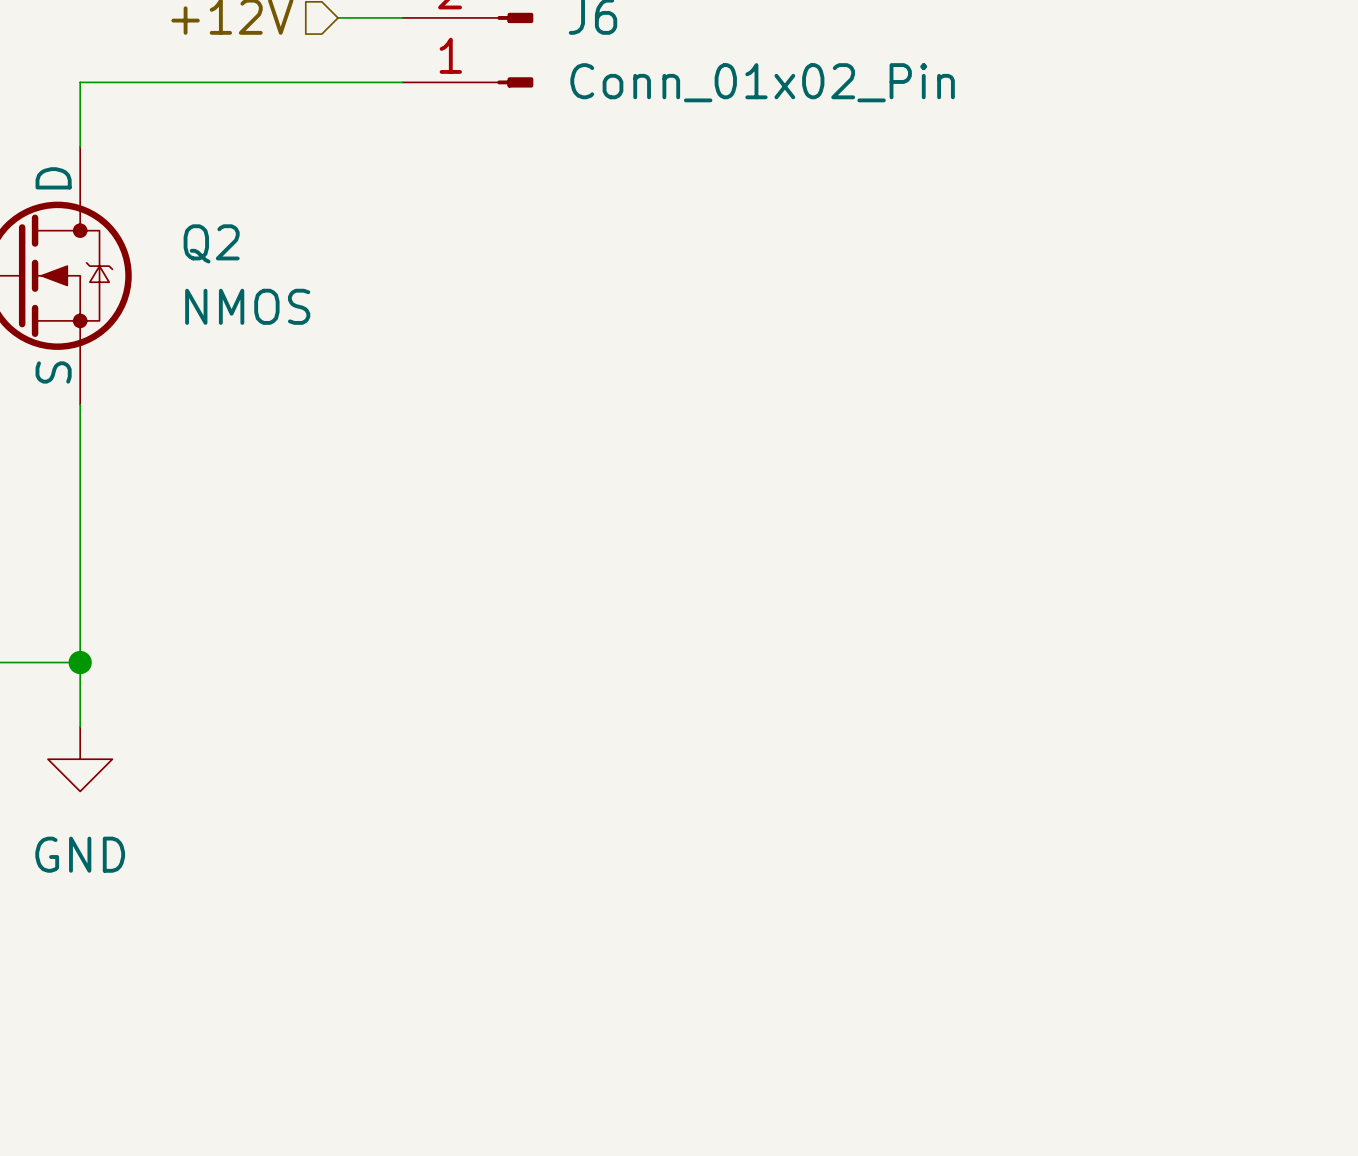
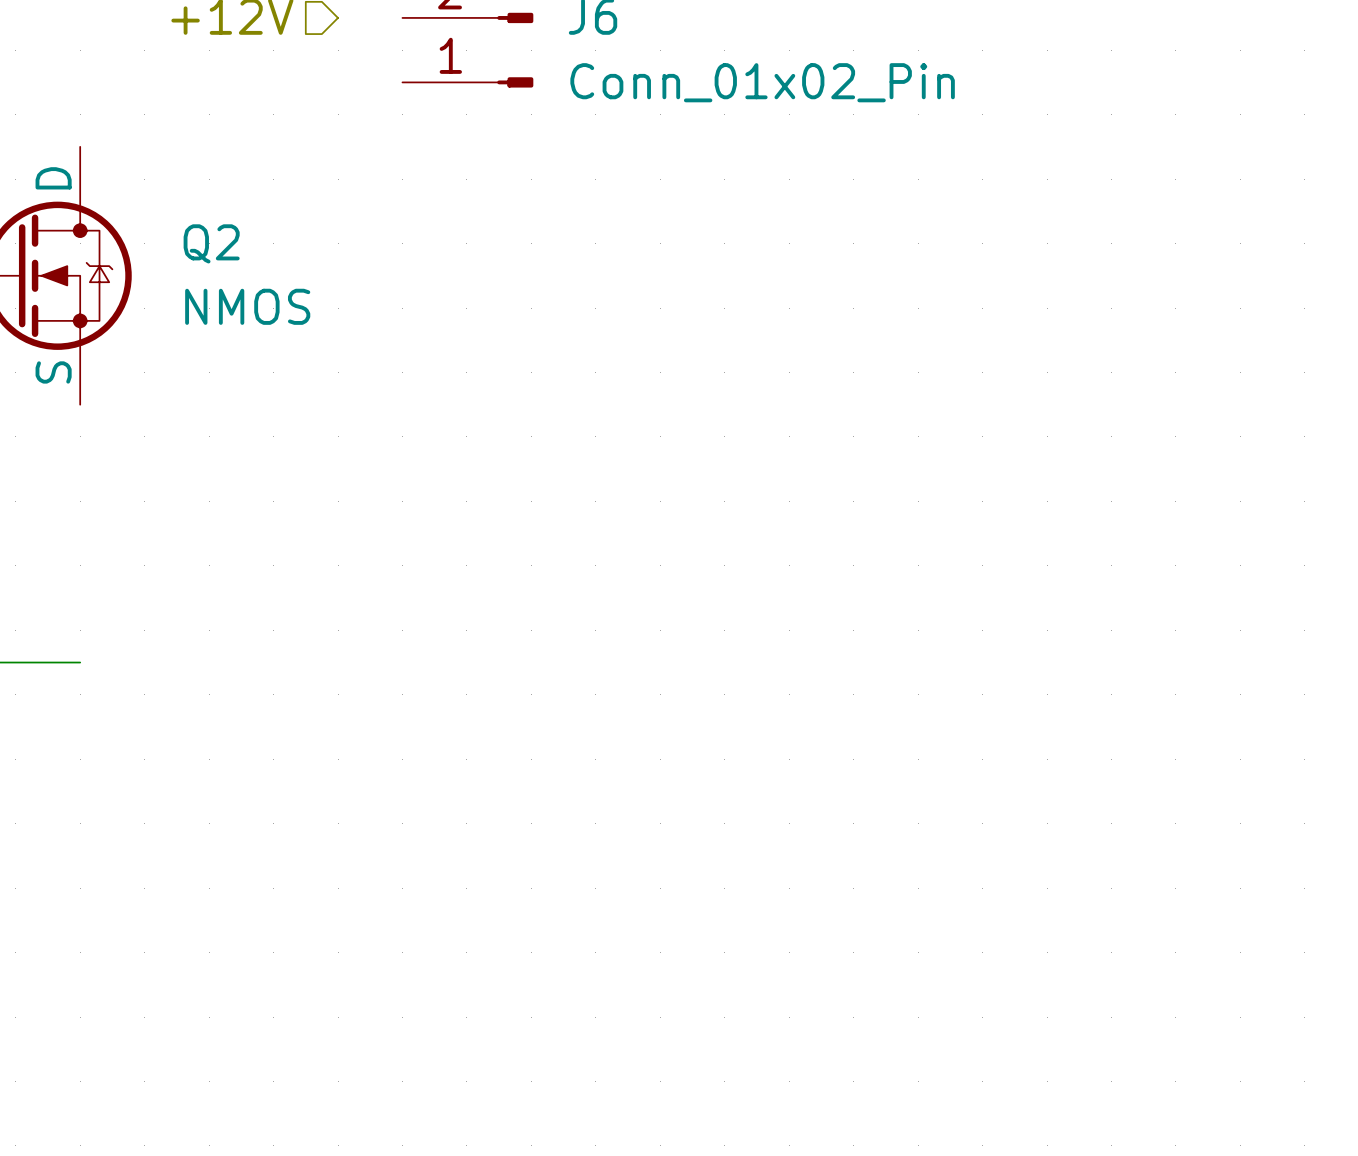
wire: (338, 17) (402, 17) -> none
wire: (402, 82) (80, 82) (80, 146) -> none
wire: (80, 404) (80, 726) -> none
junction: (80, 662) -> none
power symbol: GND (80, 759) -> none

